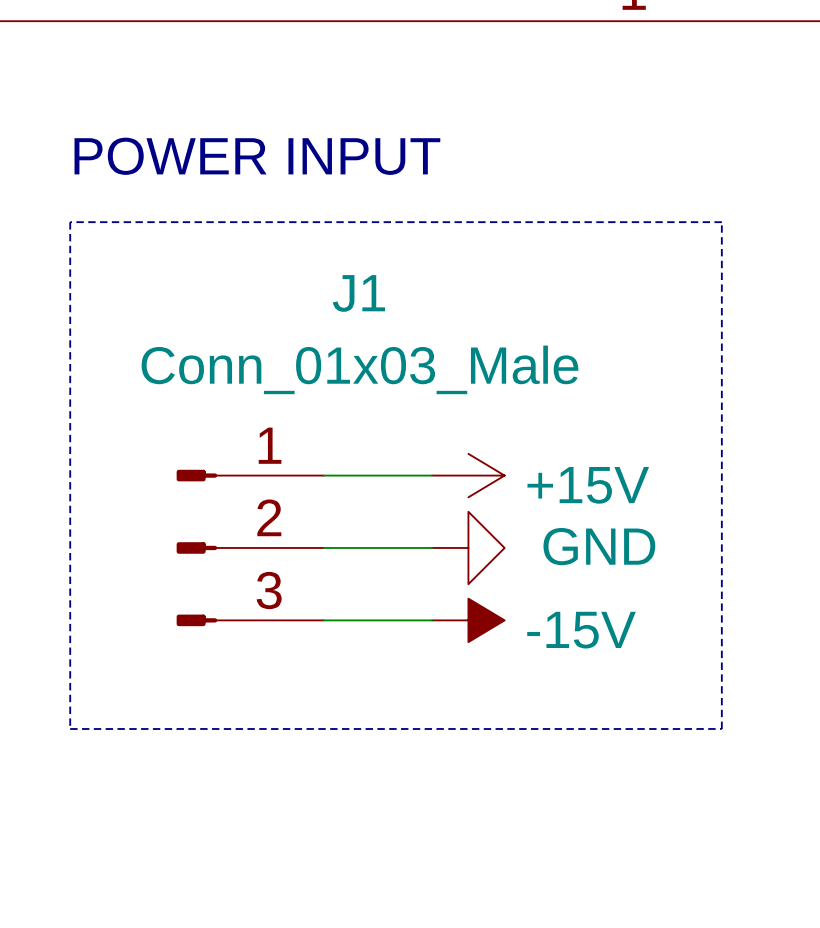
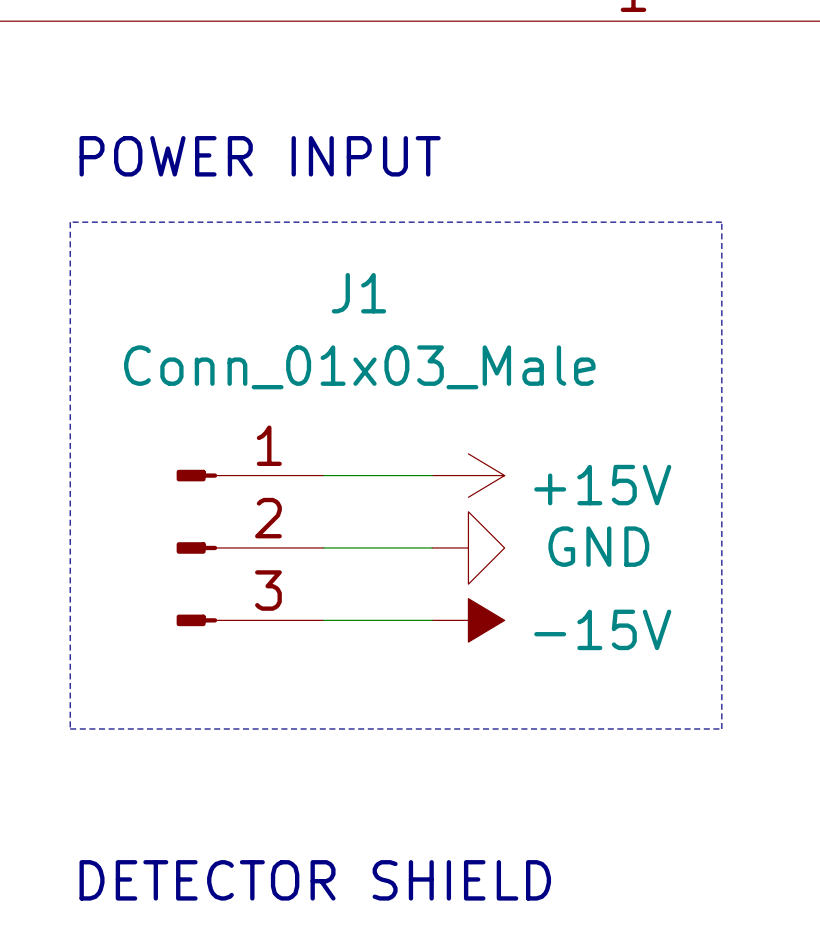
text: none -> DETECTOR SHIELD (315, 880)

